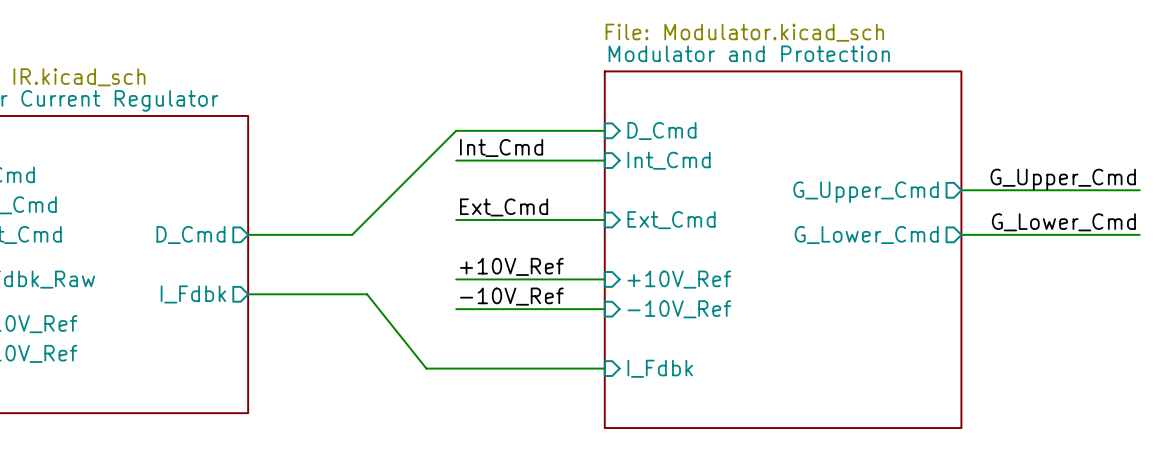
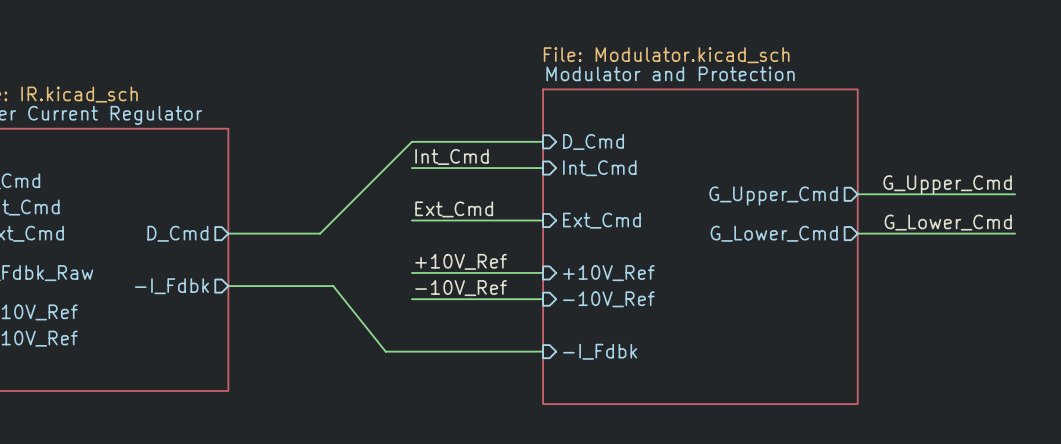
sheet pin: I_Fdbk (193, 294) -> -I_Fdbk (171, 286)
sheet pin: I_Fdbk (660, 368) -> -I_Fdbk (600, 351)

